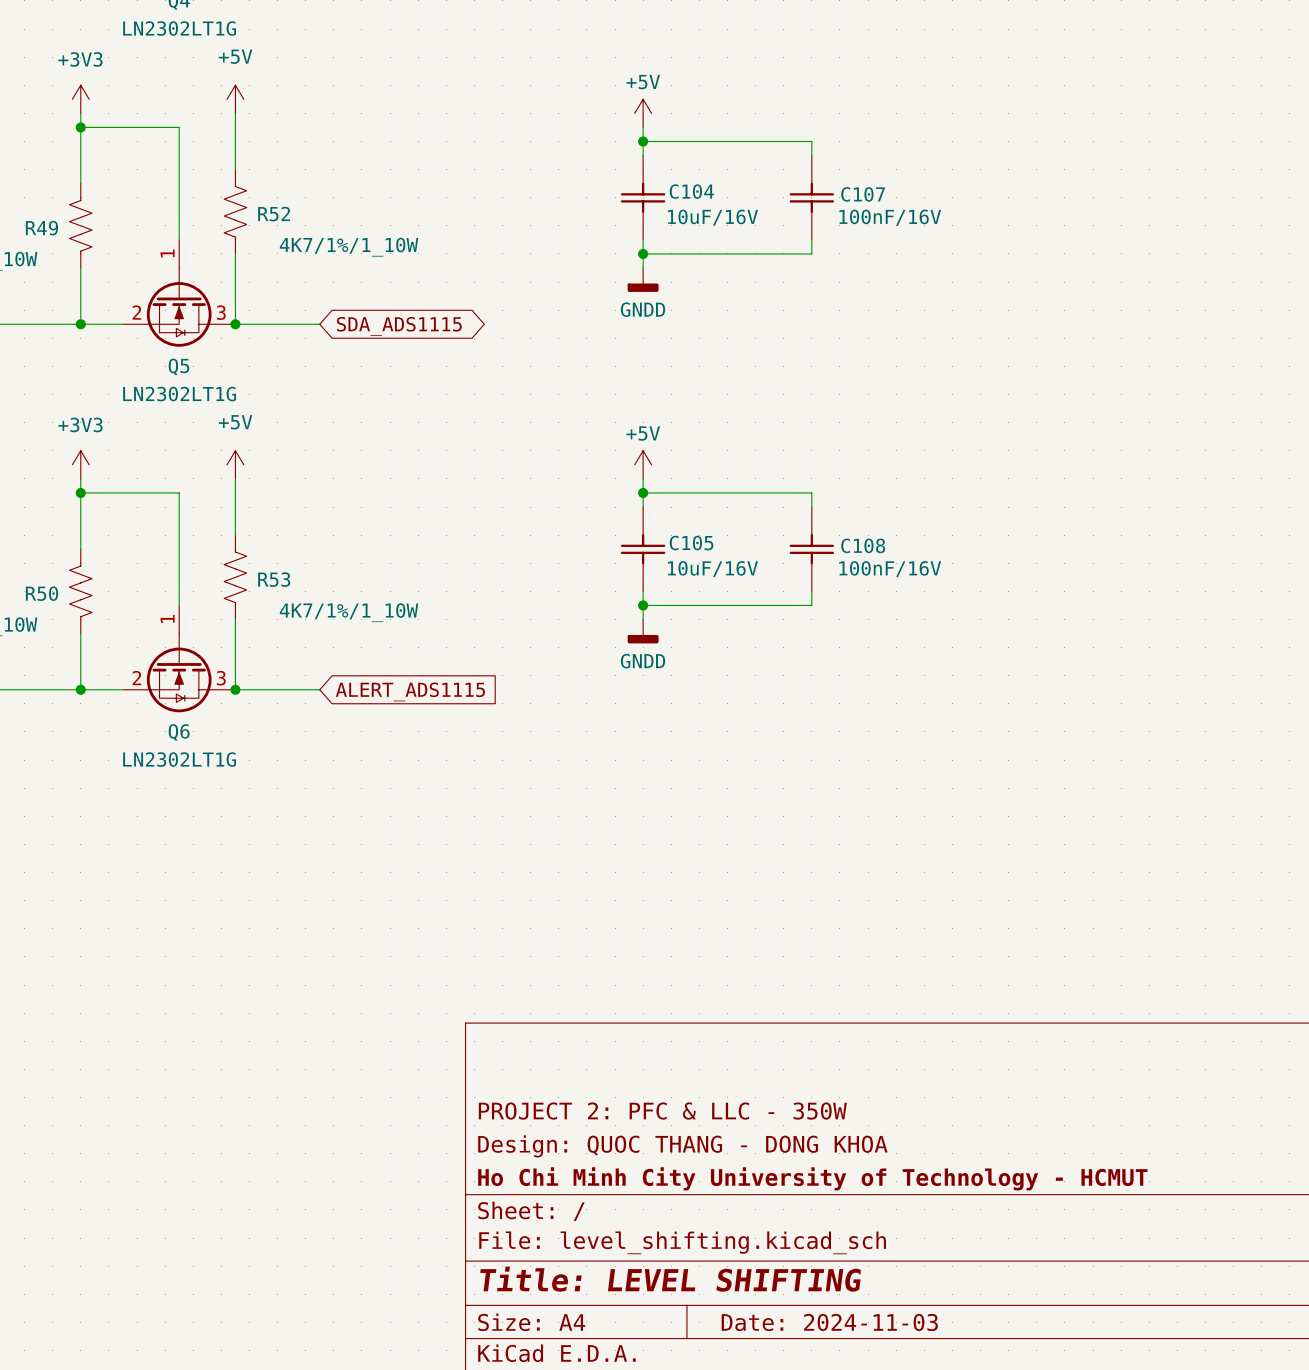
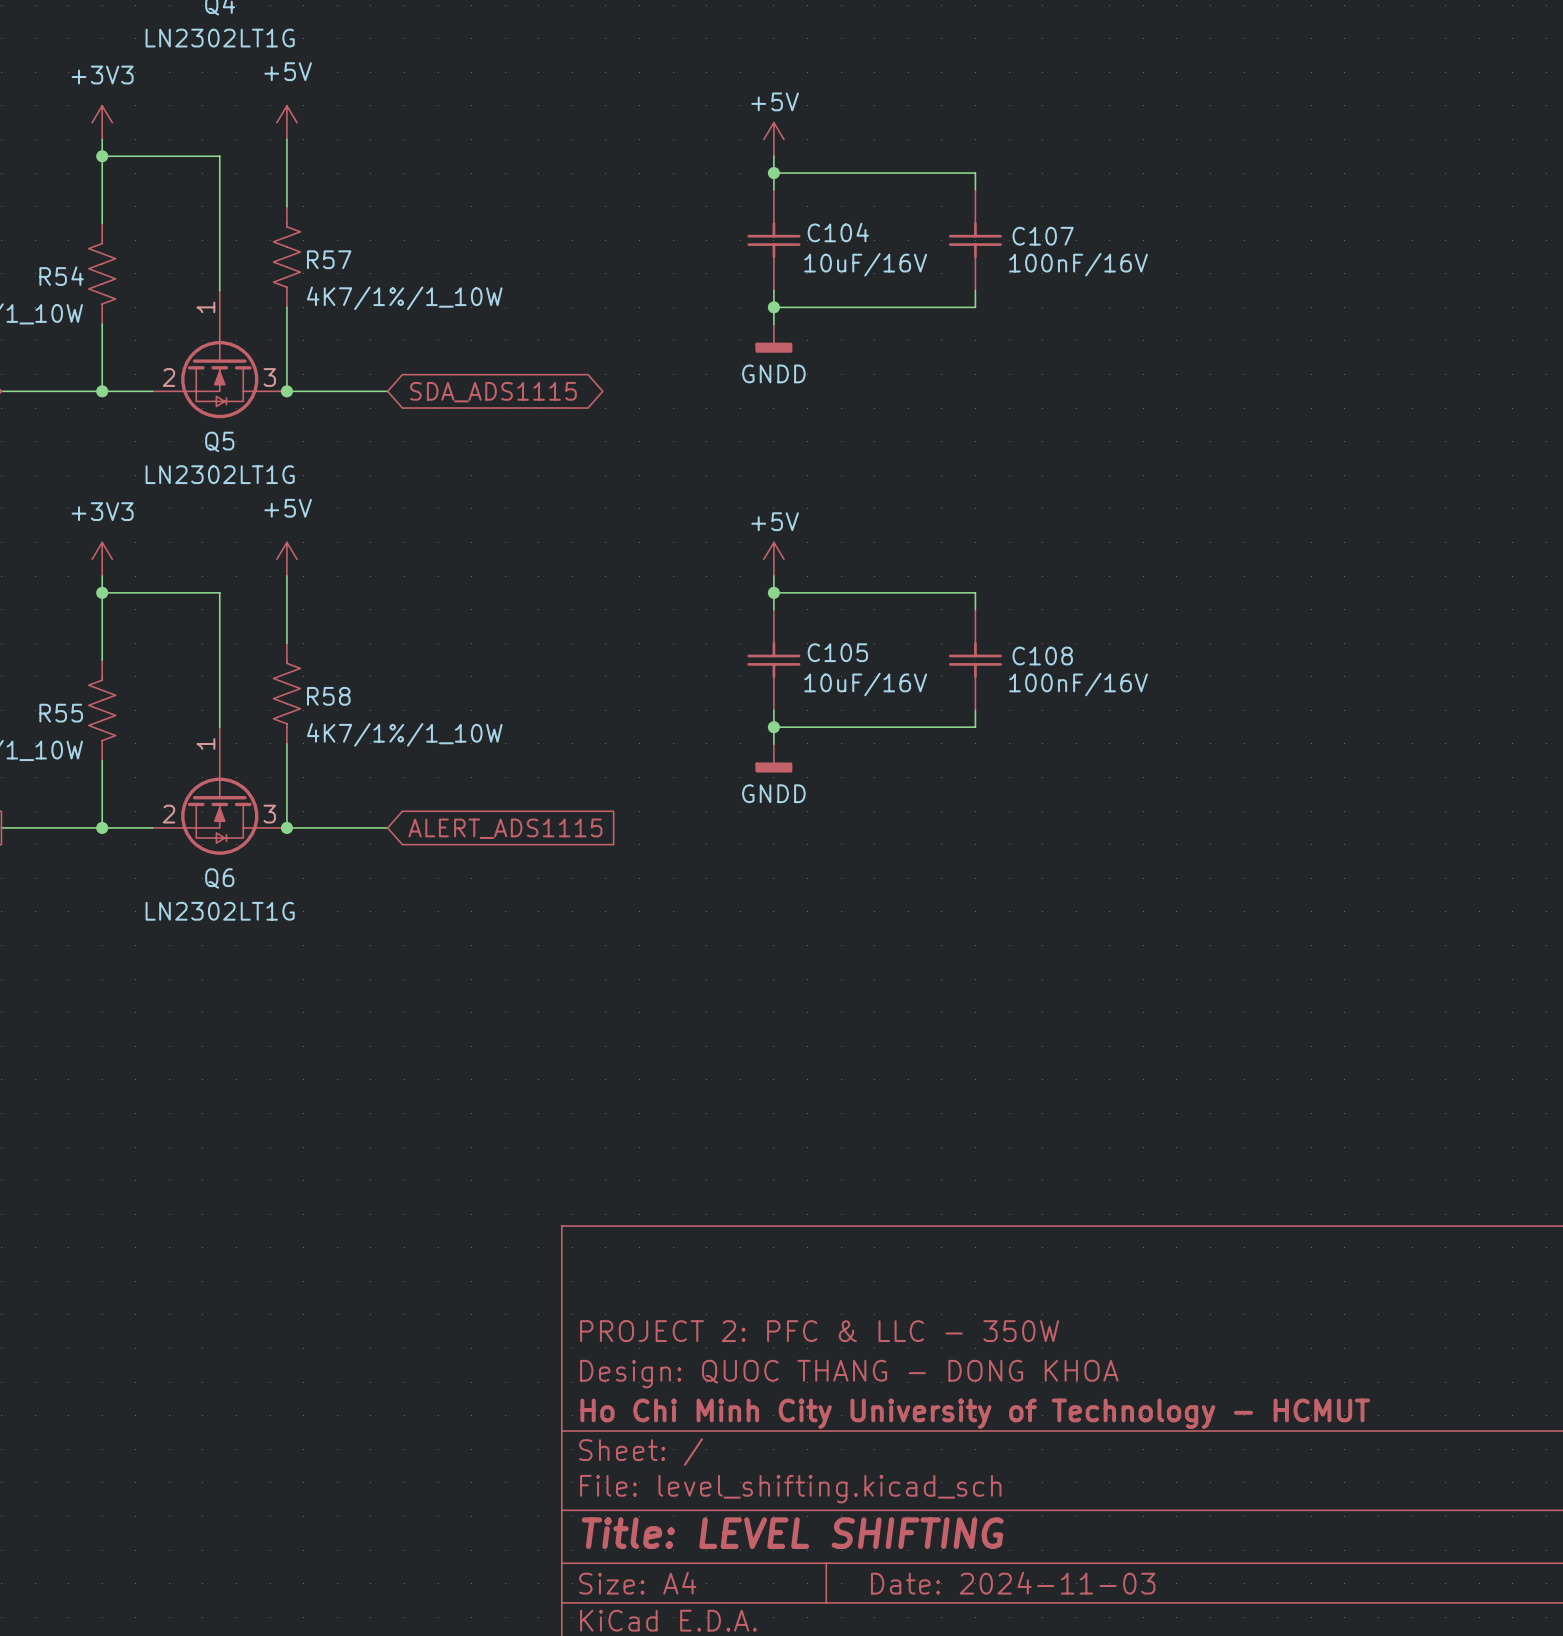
R52 name: R52 (274, 214) -> R57 (329, 259)
R49 name: R49 (41, 228) -> R54 (61, 276)
R53 name: R53 (274, 579) -> R58 (328, 696)
R50 name: R50 (42, 593) -> R55 (61, 713)

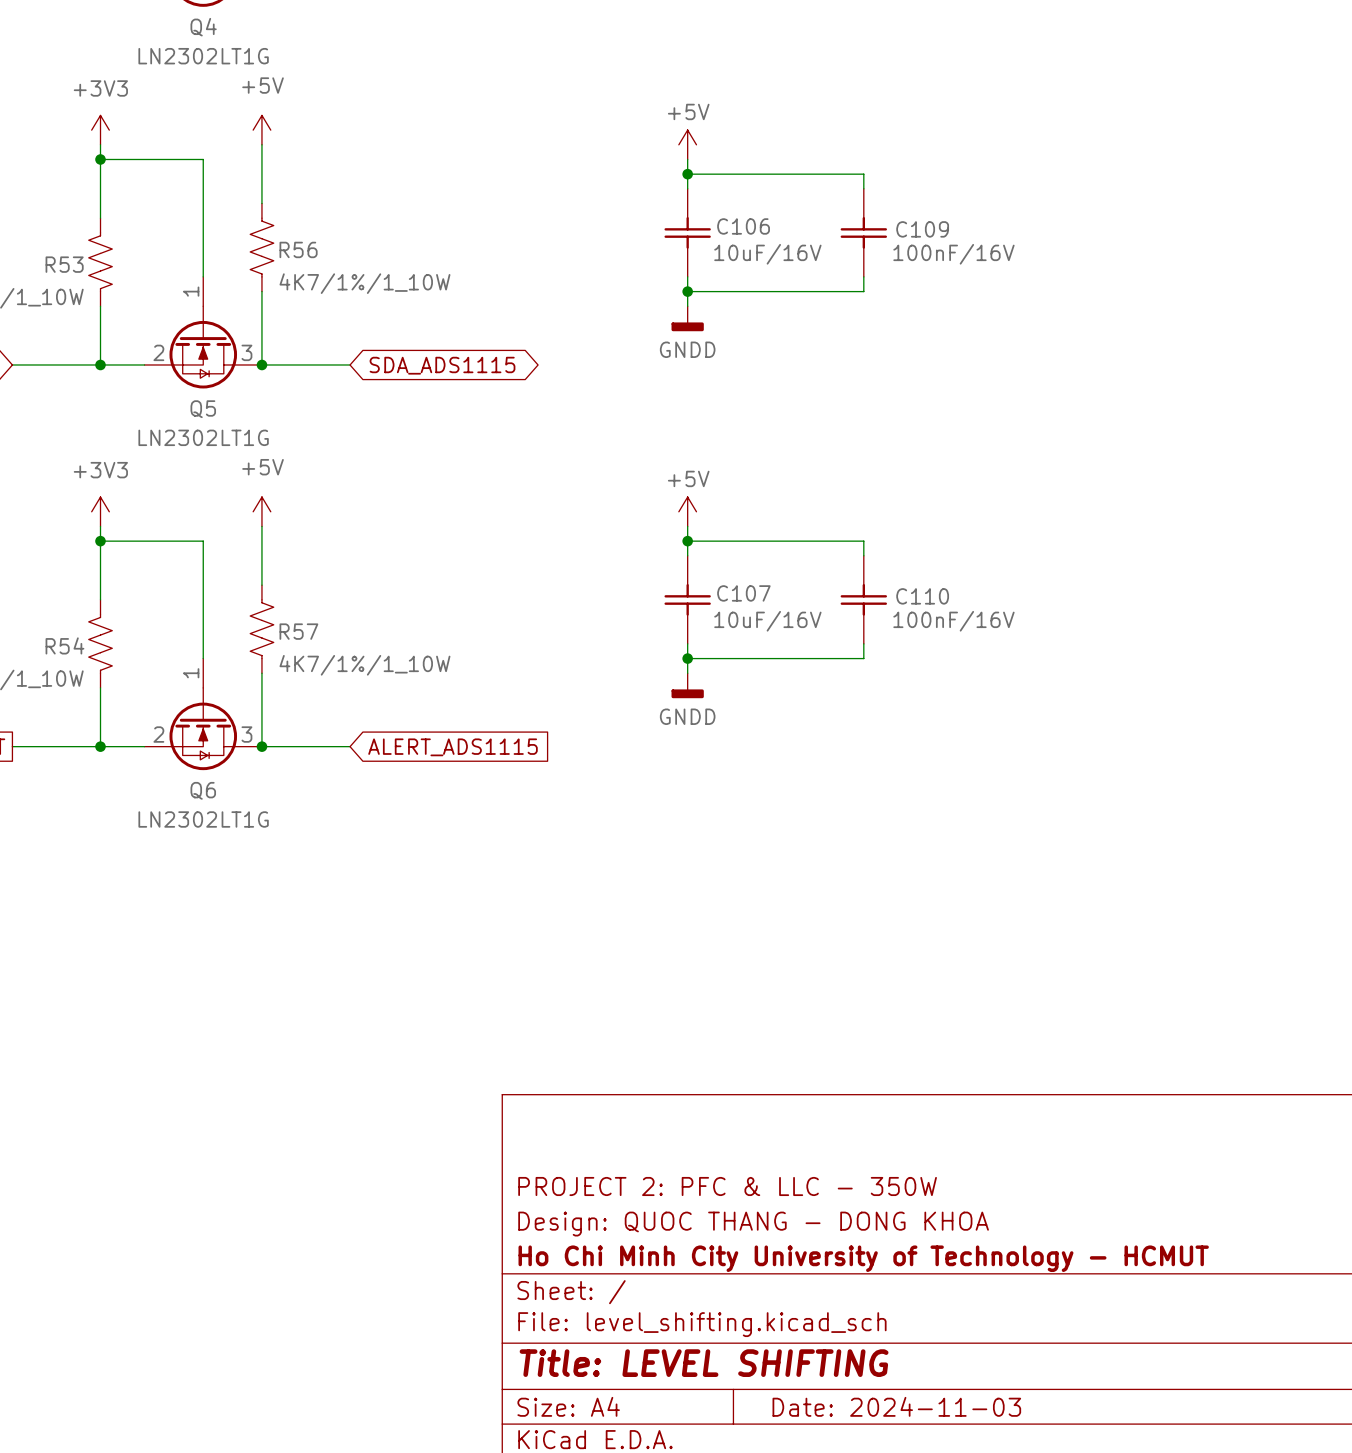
C104 name: C104 (838, 232) -> C106 (743, 226)
C107 name: C107 (1043, 236) -> C109 (922, 229)
R57 name: R57 (329, 259) -> R56 (298, 249)
R54 name: R54 (61, 276) -> R53 (64, 264)
C105 name: C105 (837, 652) -> C107 (743, 593)
C108 name: C108 (1042, 656) -> C110 (922, 596)
R58 name: R58 (328, 696) -> R57 (298, 631)
R55 name: R55 (61, 713) -> R54 (64, 645)

